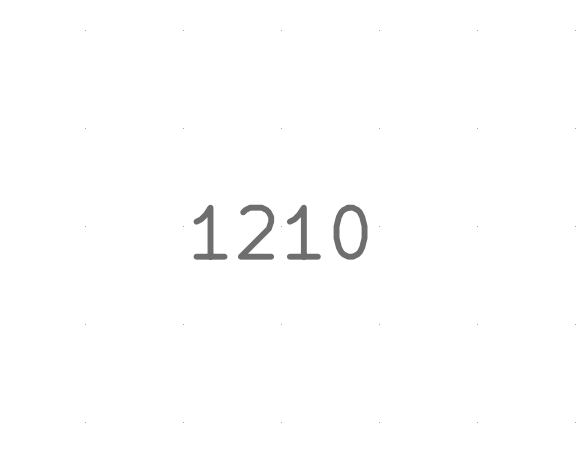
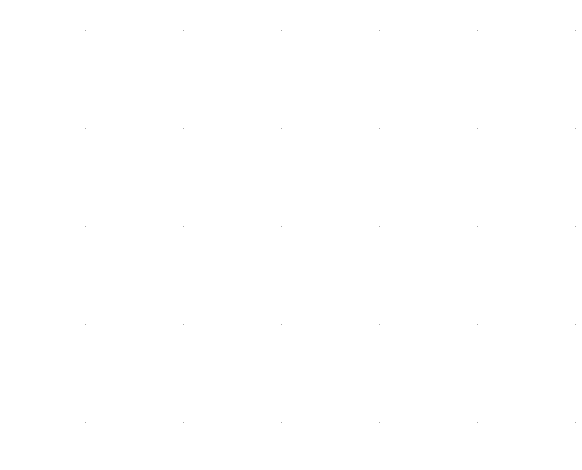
label: 1210 (280, 232) -> none

